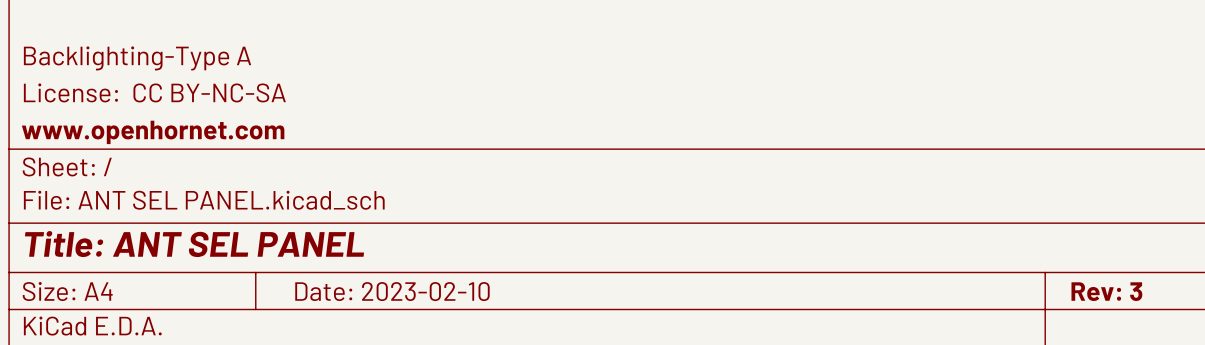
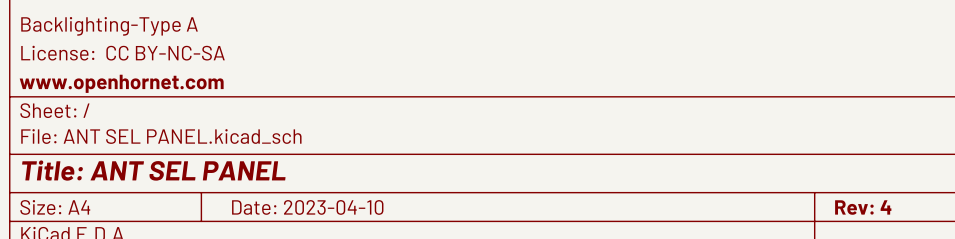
title block: Date: 2023-02-10 (392, 291) -> Date: 2023-04-10 (307, 207)
title block: Rev: 3 (1106, 291) -> Rev: 4 (863, 207)

